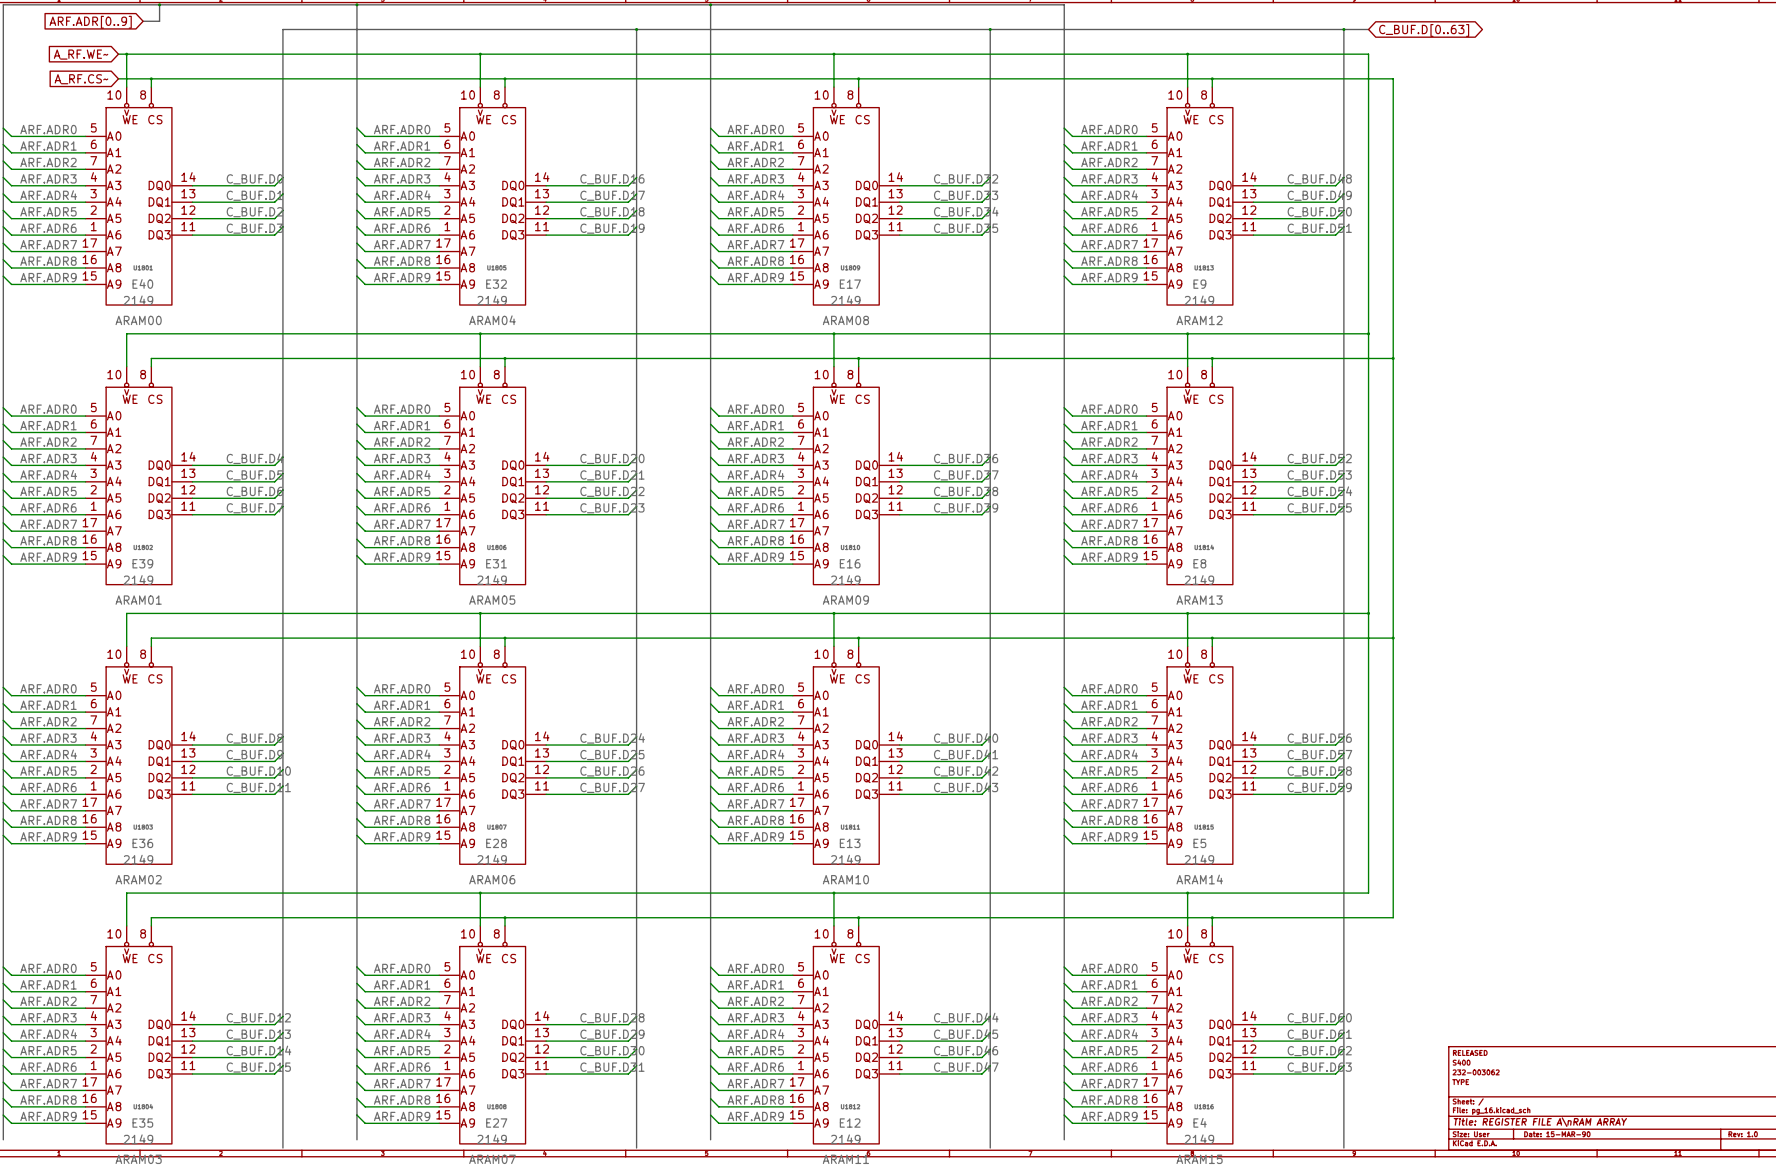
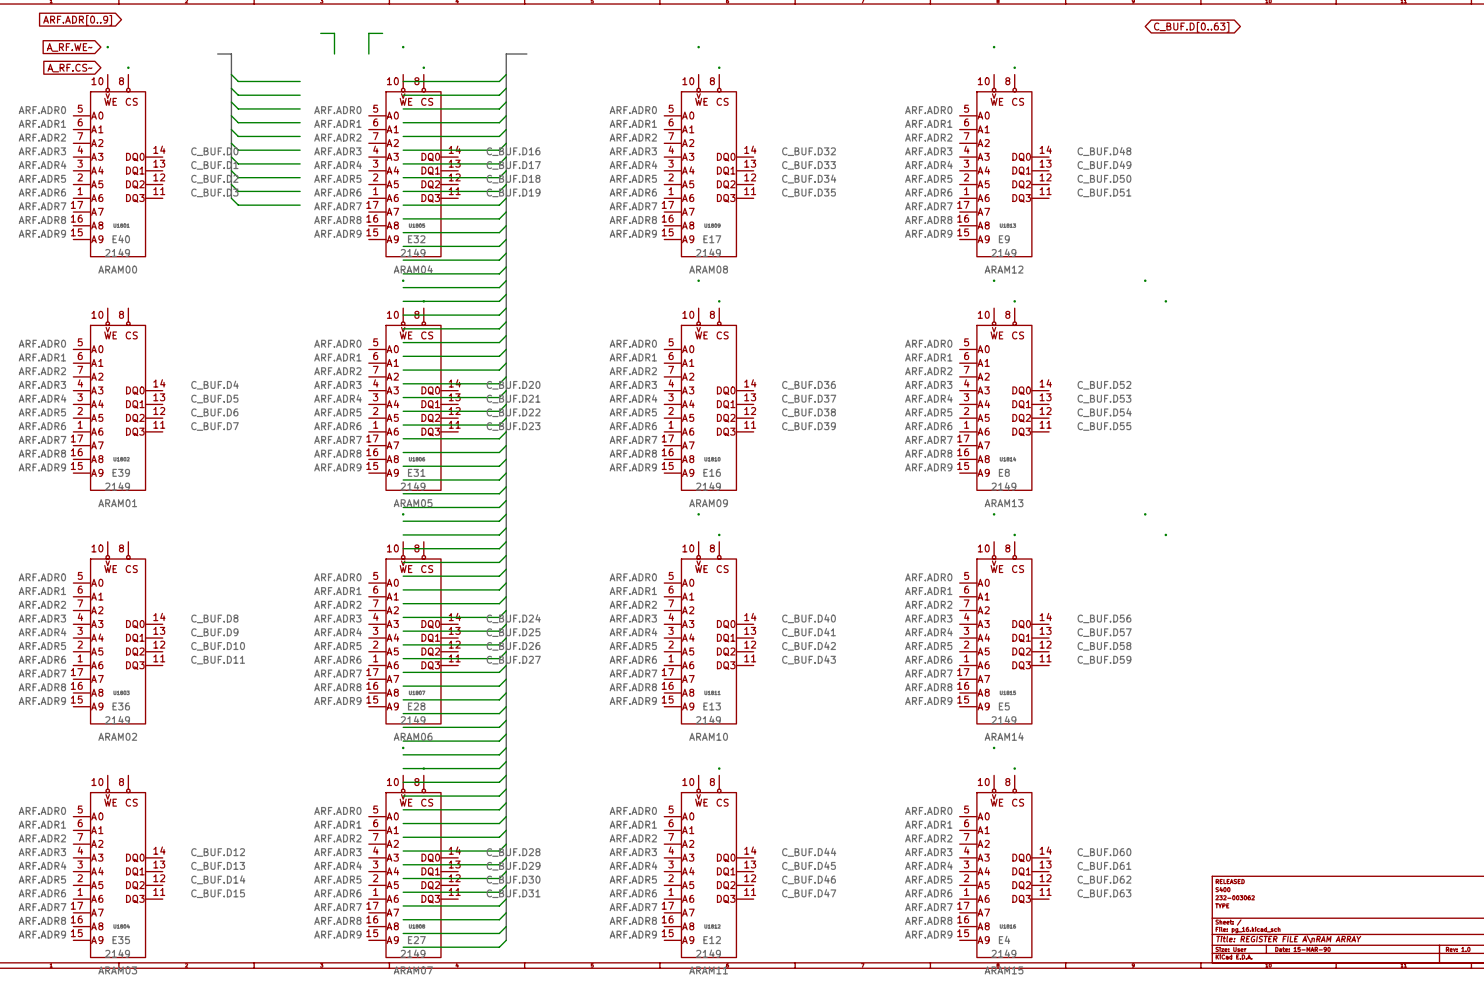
bus: (159, 4) (159, 21) (143, 21) -> none
junction: (159, 4) -> none
bus: (356, 4) (356, 1139) -> none
junction: (356, 4) -> none
bus: (710, 4) (710, 1139) -> none
junction: (710, 4) -> none
bus: (636, 29) (636, 1148) -> none
junction: (636, 29) -> none
bus: (990, 29) (990, 1148) -> none
junction: (990, 29) -> none
bus: (1343, 29) (1343, 1148) -> none
junction: (1343, 29) -> none
bus: (1368, 29) (282, 29) (282, 1148) -> none
wire: none -> (320, 33) (334, 33) (334, 53)
wire: none -> (382, 33) (368, 33) (368, 53)
wire: (118, 54) (1368, 54) (1368, 893) (126, 893) (126, 925) -> none
wire: (126, 54) (126, 87) -> none
wire: (480, 54) (480, 87) -> none
wire: (833, 54) (833, 87) -> none
wire: (1187, 54) (1187, 87) -> none
bus: none -> (217, 53) (231, 53) (231, 198)
bus: none -> (526, 53) (506, 53) (506, 940)
wire: (118, 78) (1393, 78) (1393, 917) (595, 917) -> (506, 761) (499, 768)
wire: (151, 78) (151, 87) -> none
wire: (505, 78) (505, 87) -> none
wire: (858, 78) (858, 87) -> none
wire: (1212, 78) (1212, 87) -> none
wire: none -> (231, 74) (238, 81) (300, 81)
wire: none -> (506, 74) (499, 81) (403, 81)
wire: none -> (231, 88) (238, 95) (300, 95)
wire: none -> (506, 88) (499, 95) (403, 95)
wire: none -> (506, 102) (499, 108) (403, 108)
wire: (3, 128) (11, 136) (85, 136) -> none
wire: (356, 128) (365, 136) (439, 136) -> (300, 108) (238, 108) (231, 102)
wire: (710, 128) (718, 136) (792, 136) -> none
wire: (1064, 128) (1072, 136) (1146, 136) -> none
wire: none -> (506, 115) (499, 122) (403, 122)
wire: (3, 144) (11, 152) (85, 152) -> none
wire: (356, 144) (365, 152) (439, 152) -> (300, 122) (238, 122) (231, 115)
wire: (710, 144) (718, 152) (792, 152) -> none
wire: (1064, 144) (1072, 152) (1146, 152) -> none
wire: none -> (506, 129) (499, 136) (403, 136)
wire: (3, 161) (11, 169) (85, 169) -> none
wire: (356, 161) (365, 169) (439, 169) -> (300, 136) (238, 136) (231, 129)
wire: (710, 161) (718, 169) (792, 169) -> none
wire: (1064, 161) (1072, 169) (1146, 169) -> none
wire: none -> (506, 143) (499, 150) (403, 150)
wire: (3, 177) (11, 185) (85, 185) -> none
wire: (282, 177) (274, 185) (192, 185) -> none
wire: (356, 177) (365, 185) (439, 185) -> (300, 150) (238, 150) (231, 143)
wire: (636, 177) (628, 185) (546, 185) -> none
wire: (710, 177) (718, 185) (792, 185) -> none
wire: (990, 177) (982, 185) (899, 185) -> none
wire: (1064, 177) (1072, 185) (1146, 185) -> none
wire: (1343, 177) (1335, 185) (1253, 185) -> none
wire: none -> (506, 157) (499, 163) (403, 163)
wire: (3, 193) (11, 202) (85, 202) -> none
wire: (282, 193) (274, 202) (192, 202) -> none
wire: (356, 193) (365, 202) (439, 202) -> (300, 163) (238, 163) (231, 157)
wire: (636, 193) (628, 202) (546, 202) -> none
wire: (710, 193) (718, 202) (792, 202) -> none
wire: (990, 193) (982, 202) (899, 202) -> none
wire: (1064, 193) (1072, 202) (1146, 202) -> none
wire: (1343, 193) (1335, 202) (1253, 202) -> none
wire: none -> (506, 170) (499, 177) (403, 177)
wire: (3, 210) (11, 218) (85, 218) -> none
wire: (282, 210) (274, 218) (192, 218) -> none
wire: (356, 210) (365, 218) (439, 218) -> (300, 177) (238, 177) (231, 170)
wire: (636, 210) (628, 218) (546, 218) -> none
wire: (710, 210) (718, 218) (792, 218) -> none
wire: (990, 210) (982, 218) (899, 218) -> none
wire: (1064, 210) (1072, 218) (1146, 218) -> none
wire: (1343, 210) (1335, 218) (1253, 218) -> none
wire: none -> (506, 184) (499, 191) (403, 191)
wire: (3, 226) (11, 235) (85, 235) -> none
wire: (282, 226) (274, 235) (192, 235) -> none
wire: (356, 226) (365, 235) (439, 235) -> (300, 191) (238, 191) (231, 184)
wire: (636, 226) (628, 235) (546, 235) -> none
wire: (710, 226) (718, 235) (792, 235) -> none
wire: (990, 226) (982, 235) (899, 235) -> none
wire: (1064, 226) (1072, 235) (1146, 235) -> none
wire: (1343, 226) (1335, 235) (1253, 235) -> none
wire: none -> (506, 198) (499, 205) (403, 205)
wire: (3, 243) (11, 251) (85, 251) -> none
wire: (356, 243) (365, 251) (439, 251) -> (300, 205) (238, 205) (231, 198)
wire: (710, 243) (718, 251) (792, 251) -> none
wire: (1064, 243) (1072, 251) (1146, 251) -> none
wire: none -> (506, 212) (499, 218) (403, 218)
wire: (3, 259) (11, 268) (85, 268) -> none
wire: (356, 259) (365, 268) (439, 268) -> none
wire: (710, 259) (718, 268) (792, 268) -> none
wire: (1064, 259) (1072, 268) (1146, 268) -> none
wire: none -> (506, 225) (499, 232) (403, 232)
wire: (3, 276) (11, 284) (85, 284) -> none
wire: (356, 276) (365, 284) (439, 284) -> none
wire: (710, 276) (718, 284) (792, 284) -> none
wire: (1064, 276) (1072, 284) (1146, 284) -> none
wire: none -> (506, 239) (499, 246) (403, 246)
wire: none -> (506, 253) (499, 260) (403, 260)
wire: none -> (506, 266) (499, 273) (403, 273)
wire: (480, 333) (480, 366) -> none
wire: none -> (506, 280) (499, 287) (403, 287)
wire: (833, 333) (833, 366) -> none
wire: (1187, 333) (1187, 366) -> none
wire: (1368, 333) (126, 333) (126, 366) -> none
wire: (480, 358) (151, 358) (151, 366) -> none
wire: (505, 358) (505, 366) -> none
wire: (595, 358) (1393, 358) -> (499, 301) (506, 294)
wire: (858, 358) (858, 366) -> none
wire: (1212, 358) (1212, 366) -> none
wire: none -> (506, 308) (499, 315) (403, 315)
wire: none -> (506, 321) (499, 328) (403, 328)
wire: none -> (506, 335) (499, 342) (403, 342)
wire: (3, 407) (11, 416) (85, 416) -> none
wire: (356, 407) (365, 416) (439, 416) -> none
wire: (710, 407) (718, 416) (792, 416) -> none
wire: (1064, 407) (1072, 416) (1146, 416) -> none
wire: none -> (506, 349) (499, 356) (403, 356)
wire: (3, 424) (11, 432) (85, 432) -> none
wire: (356, 424) (365, 432) (439, 432) -> none
wire: (710, 424) (718, 432) (792, 432) -> none
wire: (1064, 424) (1072, 432) (1146, 432) -> none
wire: none -> (506, 363) (499, 370) (403, 370)
wire: (3, 440) (11, 448) (85, 448) -> none
wire: (356, 440) (365, 448) (439, 448) -> none
wire: (710, 440) (718, 448) (792, 448) -> none
wire: (1064, 440) (1072, 448) (1146, 448) -> none
wire: none -> (506, 376) (499, 383) (403, 383)
wire: (3, 457) (11, 465) (85, 465) -> none
wire: (282, 457) (274, 465) (192, 465) -> none
wire: (356, 457) (365, 465) (439, 465) -> none
wire: (636, 457) (628, 465) (546, 465) -> none
wire: (710, 457) (718, 465) (792, 465) -> none
wire: (990, 457) (982, 465) (899, 465) -> none
wire: (1064, 457) (1072, 465) (1146, 465) -> none
wire: (1343, 457) (1335, 465) (1253, 465) -> none
wire: none -> (506, 390) (499, 397) (403, 397)
wire: (3, 473) (11, 481) (85, 481) -> none
wire: (282, 473) (274, 481) (192, 481) -> none
wire: (356, 473) (365, 481) (439, 481) -> none
wire: (636, 473) (628, 481) (546, 481) -> none
wire: (710, 473) (718, 481) (792, 481) -> none
wire: (990, 473) (982, 481) (899, 481) -> none
wire: (1064, 473) (1072, 481) (1146, 481) -> none
wire: (1343, 473) (1335, 481) (1253, 481) -> none
wire: none -> (506, 404) (499, 411) (403, 411)
wire: (3, 490) (11, 498) (85, 498) -> none
wire: (282, 490) (274, 498) (192, 498) -> none
wire: (356, 490) (365, 498) (439, 498) -> none
wire: (636, 490) (628, 498) (546, 498) -> none
wire: (710, 490) (718, 498) (792, 498) -> none
wire: (990, 490) (982, 498) (899, 498) -> none
wire: (1064, 490) (1072, 498) (1146, 498) -> none
wire: (1343, 490) (1335, 498) (1253, 498) -> none
wire: none -> (506, 418) (499, 425) (403, 425)
wire: (3, 506) (11, 514) (85, 514) -> none
wire: (282, 506) (274, 514) (192, 514) -> none
wire: (356, 506) (365, 514) (439, 514) -> none
wire: (636, 506) (628, 514) (546, 514) -> none
wire: (710, 506) (718, 514) (792, 514) -> none
wire: (990, 506) (982, 514) (899, 514) -> none
wire: (1064, 506) (1072, 514) (1146, 514) -> none
wire: (1343, 506) (1335, 514) (1253, 514) -> none
wire: none -> (506, 431) (499, 438) (403, 438)
wire: (3, 522) (11, 531) (85, 531) -> none
wire: (356, 522) (365, 531) (439, 531) -> none
wire: (710, 522) (718, 531) (792, 531) -> none
wire: (1064, 522) (1072, 531) (1146, 531) -> none
wire: none -> (506, 445) (499, 452) (403, 452)
wire: (3, 539) (11, 547) (85, 547) -> none
wire: (356, 539) (365, 547) (439, 547) -> none
wire: (710, 539) (718, 547) (792, 547) -> none
wire: (1064, 539) (1072, 547) (1146, 547) -> none
wire: none -> (506, 459) (499, 466) (403, 466)
wire: (3, 555) (11, 564) (85, 564) -> none
wire: (356, 555) (365, 564) (439, 564) -> none
wire: (710, 555) (718, 564) (792, 564) -> none
wire: (1064, 555) (1072, 564) (1146, 564) -> none
wire: none -> (506, 473) (499, 479) (403, 479)
wire: none -> (506, 486) (499, 493) (403, 493)
wire: none -> (506, 500) (499, 507) (403, 507)
wire: (480, 613) (480, 646) -> none
wire: none -> (506, 514) (499, 521) (403, 521)
wire: (833, 613) (833, 646) -> none
wire: (1187, 613) (1187, 646) -> none
wire: (1368, 613) (126, 613) (126, 646) -> none
wire: (480, 638) (151, 638) (151, 646) -> none
wire: (505, 638) (505, 646) -> none
wire: (595, 638) (1393, 638) -> (499, 534) (506, 528)
wire: (858, 638) (858, 646) -> none
wire: (1212, 638) (1212, 646) -> none
wire: none -> (506, 541) (499, 548) (403, 548)
wire: none -> (506, 555) (499, 562) (403, 562)
wire: none -> (506, 569) (499, 576) (403, 576)
wire: (3, 687) (11, 695) (85, 695) -> none
wire: (356, 687) (365, 695) (439, 695) -> none
wire: (710, 687) (718, 695) (792, 695) -> none
wire: (1064, 687) (1072, 695) (1146, 695) -> none
wire: none -> (506, 583) (499, 589) (403, 589)
wire: (3, 703) (11, 712) (85, 712) -> none
wire: (356, 703) (365, 712) (439, 712) -> none
wire: (710, 703) (718, 712) (792, 712) -> none
wire: (1064, 703) (1072, 712) (1146, 712) -> none
wire: none -> (506, 596) (499, 603) (403, 603)
wire: (3, 720) (11, 728) (85, 728) -> none
wire: (356, 720) (365, 728) (439, 728) -> none
wire: (710, 720) (718, 728) (792, 728) -> none
wire: (1064, 720) (1072, 728) (1146, 728) -> none
wire: none -> (506, 610) (499, 617) (403, 617)
wire: (3, 736) (11, 745) (85, 745) -> none
wire: (282, 736) (274, 745) (192, 745) -> none
wire: (356, 736) (365, 745) (439, 745) -> none
wire: (636, 736) (628, 745) (546, 745) -> none
wire: (710, 736) (718, 745) (792, 745) -> none
wire: (990, 736) (982, 745) (899, 745) -> none
wire: (1064, 736) (1072, 745) (1146, 745) -> none
wire: (1343, 736) (1335, 745) (1253, 745) -> none
wire: none -> (506, 624) (499, 631) (403, 631)
wire: (3, 753) (11, 761) (85, 761) -> none
wire: (282, 753) (274, 761) (192, 761) -> none
wire: (356, 753) (365, 761) (439, 761) -> none
wire: (636, 753) (628, 761) (546, 761) -> none
wire: (710, 753) (718, 761) (792, 761) -> none
wire: (990, 753) (982, 761) (899, 761) -> none
wire: (1064, 753) (1072, 761) (1146, 761) -> none
wire: (1343, 753) (1335, 761) (1253, 761) -> none
wire: none -> (506, 638) (499, 644) (403, 644)
wire: (3, 769) (11, 777) (85, 777) -> none
wire: (282, 769) (274, 777) (192, 777) -> none
wire: (356, 769) (365, 777) (439, 777) -> none
wire: (636, 769) (628, 777) (546, 777) -> none
wire: (710, 769) (718, 777) (792, 777) -> none
wire: (990, 769) (982, 777) (899, 777) -> none
wire: (1064, 769) (1072, 777) (1146, 777) -> none
wire: (1343, 769) (1335, 777) (1253, 777) -> none
wire: none -> (506, 651) (499, 658) (403, 658)
wire: (3, 786) (11, 794) (85, 794) -> none
wire: (282, 786) (274, 794) (192, 794) -> none
wire: (356, 786) (365, 794) (439, 794) -> none
wire: (636, 786) (628, 794) (546, 794) -> none
wire: (710, 786) (718, 794) (792, 794) -> none
wire: (990, 786) (982, 794) (899, 794) -> none
wire: (1064, 786) (1072, 794) (1146, 794) -> none
wire: (1343, 786) (1335, 794) (1253, 794) -> none
wire: none -> (506, 665) (499, 672) (403, 672)
wire: (3, 802) (11, 810) (85, 810) -> none
wire: (356, 802) (365, 810) (439, 810) -> none
wire: (710, 802) (718, 810) (792, 810) -> none
wire: (1064, 802) (1072, 810) (1146, 810) -> none
wire: none -> (506, 679) (499, 686) (403, 686)
wire: (3, 819) (11, 827) (85, 827) -> none
wire: (356, 819) (365, 827) (439, 827) -> none
wire: (710, 819) (718, 827) (792, 827) -> none
wire: (1064, 819) (1072, 827) (1146, 827) -> none
wire: none -> (506, 692) (499, 699) (403, 699)
wire: (3, 835) (11, 843) (85, 843) -> none
wire: (356, 835) (365, 843) (439, 843) -> none
wire: (710, 835) (718, 843) (792, 843) -> none
wire: (1064, 835) (1072, 843) (1146, 843) -> none
wire: none -> (506, 706) (499, 713) (403, 713)
wire: none -> (506, 720) (499, 727) (403, 727)
wire: none -> (506, 734) (499, 741) (403, 741)
wire: (480, 893) (480, 925) -> none
wire: none -> (506, 747) (499, 754) (403, 754)
wire: (833, 893) (833, 925) -> none
wire: (1187, 893) (1187, 925) -> none
wire: (480, 917) (151, 917) (151, 925) -> none
wire: (505, 917) (505, 925) -> none
wire: (858, 917) (858, 925) -> none
wire: (1212, 917) (1212, 925) -> none
wire: none -> (506, 775) (499, 782) (403, 782)
wire: none -> (506, 789) (499, 796) (403, 796)
wire: none -> (506, 802) (499, 809) (403, 809)
wire: (3, 967) (11, 975) (85, 975) -> none
wire: (356, 967) (365, 975) (439, 975) -> none
wire: (710, 967) (718, 975) (792, 975) -> none
wire: (1064, 967) (1072, 975) (1146, 975) -> none
wire: none -> (506, 816) (499, 823) (403, 823)
wire: (3, 983) (11, 991) (85, 991) -> none
wire: (356, 983) (365, 991) (439, 991) -> none
wire: (710, 983) (718, 991) (792, 991) -> none
wire: (1064, 983) (1072, 991) (1146, 991) -> none
wire: none -> (506, 830) (499, 837) (403, 837)
wire: (3, 999) (11, 1008) (85, 1008) -> none
wire: (356, 999) (365, 1008) (439, 1008) -> none
wire: (710, 999) (718, 1008) (792, 1008) -> none
wire: (1064, 999) (1072, 1008) (1146, 1008) -> none
wire: none -> (506, 844) (499, 851) (403, 851)
wire: (3, 1016) (11, 1024) (85, 1024) -> none
wire: (282, 1016) (274, 1024) (192, 1024) -> none
wire: (356, 1016) (365, 1024) (439, 1024) -> none
wire: (636, 1016) (628, 1024) (546, 1024) -> none
wire: (710, 1016) (718, 1024) (792, 1024) -> none
wire: (990, 1016) (982, 1024) (899, 1024) -> none
wire: (1064, 1016) (1072, 1024) (1146, 1024) -> none
wire: (1343, 1016) (1335, 1024) (1253, 1024) -> none
wire: none -> (506, 857) (499, 864) (403, 864)
wire: (3, 1032) (11, 1041) (85, 1041) -> none
wire: (282, 1032) (274, 1041) (192, 1041) -> none
wire: (356, 1032) (365, 1041) (439, 1041) -> none
wire: (636, 1032) (628, 1041) (546, 1041) -> none
wire: (710, 1032) (718, 1041) (792, 1041) -> none
wire: (990, 1032) (982, 1041) (899, 1041) -> none
wire: (1064, 1032) (1072, 1041) (1146, 1041) -> none
wire: (1343, 1032) (1335, 1041) (1253, 1041) -> none
wire: none -> (506, 871) (499, 878) (403, 878)
wire: (3, 1049) (11, 1057) (85, 1057) -> none
wire: (282, 1049) (274, 1057) (192, 1057) -> none
wire: (356, 1049) (365, 1057) (439, 1057) -> none
wire: (636, 1049) (628, 1057) (546, 1057) -> none
wire: (710, 1049) (718, 1057) (792, 1057) -> none
wire: (990, 1049) (982, 1057) (899, 1057) -> none
wire: (1064, 1049) (1072, 1057) (1146, 1057) -> none
wire: (1343, 1049) (1335, 1057) (1253, 1057) -> none
wire: none -> (506, 885) (499, 892) (403, 892)
wire: (3, 1065) (11, 1073) (85, 1073) -> none
wire: (282, 1065) (274, 1073) (192, 1073) -> none
wire: (356, 1065) (365, 1073) (439, 1073) -> none
wire: (636, 1065) (628, 1073) (546, 1073) -> none
wire: (710, 1065) (718, 1073) (792, 1073) -> none
wire: (990, 1065) (982, 1073) (899, 1073) -> none
wire: (1064, 1065) (1072, 1073) (1146, 1073) -> none
wire: (1343, 1065) (1335, 1073) (1253, 1073) -> none
wire: none -> (506, 899) (499, 905) (403, 905)
wire: (3, 1082) (11, 1090) (85, 1090) -> none
wire: (356, 1082) (365, 1090) (439, 1090) -> none
wire: (710, 1082) (718, 1090) (792, 1090) -> none
wire: (1064, 1082) (1072, 1090) (1146, 1090) -> none
wire: none -> (506, 912) (499, 919) (403, 919)
wire: (3, 1098) (11, 1106) (85, 1106) -> none
wire: (356, 1098) (365, 1106) (439, 1106) -> none
wire: (710, 1098) (718, 1106) (792, 1106) -> none
wire: (1064, 1098) (1072, 1106) (1146, 1106) -> none
wire: none -> (506, 926) (499, 933) (403, 933)
wire: (3, 1115) (11, 1123) (85, 1123) -> none
wire: (356, 1115) (365, 1123) (439, 1123) -> none
wire: (710, 1115) (718, 1123) (792, 1123) -> none
wire: (1064, 1115) (1072, 1123) (1146, 1123) -> none
wire: none -> (506, 940) (499, 947) (403, 947)
bus: (3, 1139) (3, 4) (1064, 4) (1064, 1139) -> none

